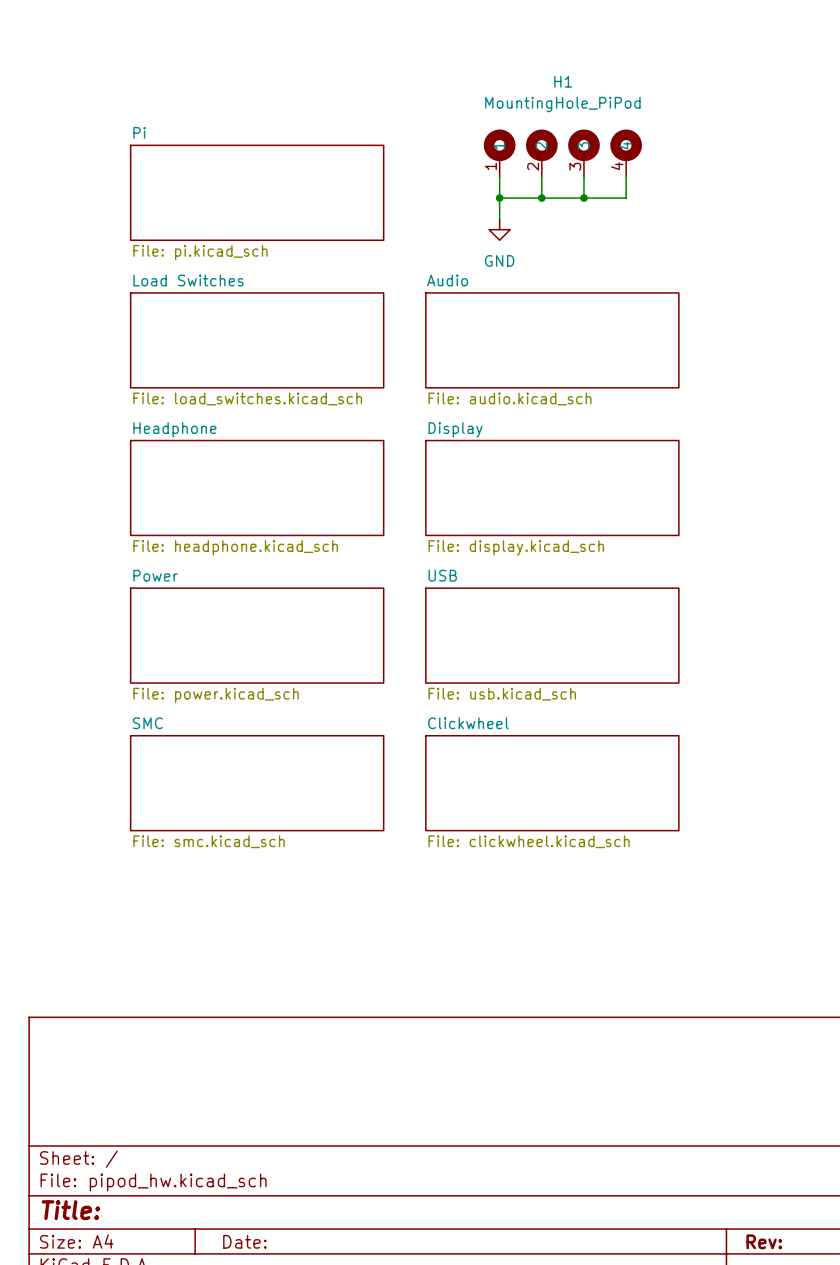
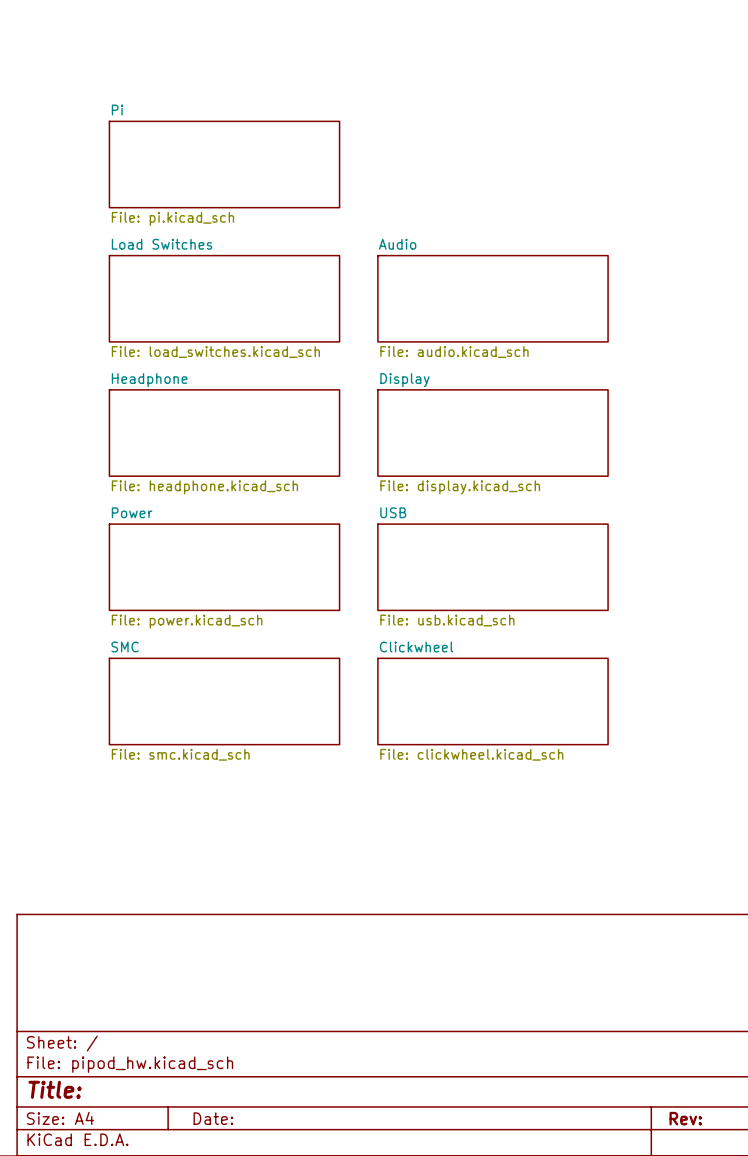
H1: MountingHole_PiPod (562, 153) -> none
wire: (499, 176) (499, 219) -> none
wire: (541, 176) (541, 198) -> none
wire: (583, 176) (583, 198) -> none
wire: (626, 176) (626, 198) (499, 198) -> none
junction: (499, 198) -> none
junction: (541, 198) -> none
junction: (583, 198) -> none
power symbol: GND (499, 229) -> none

